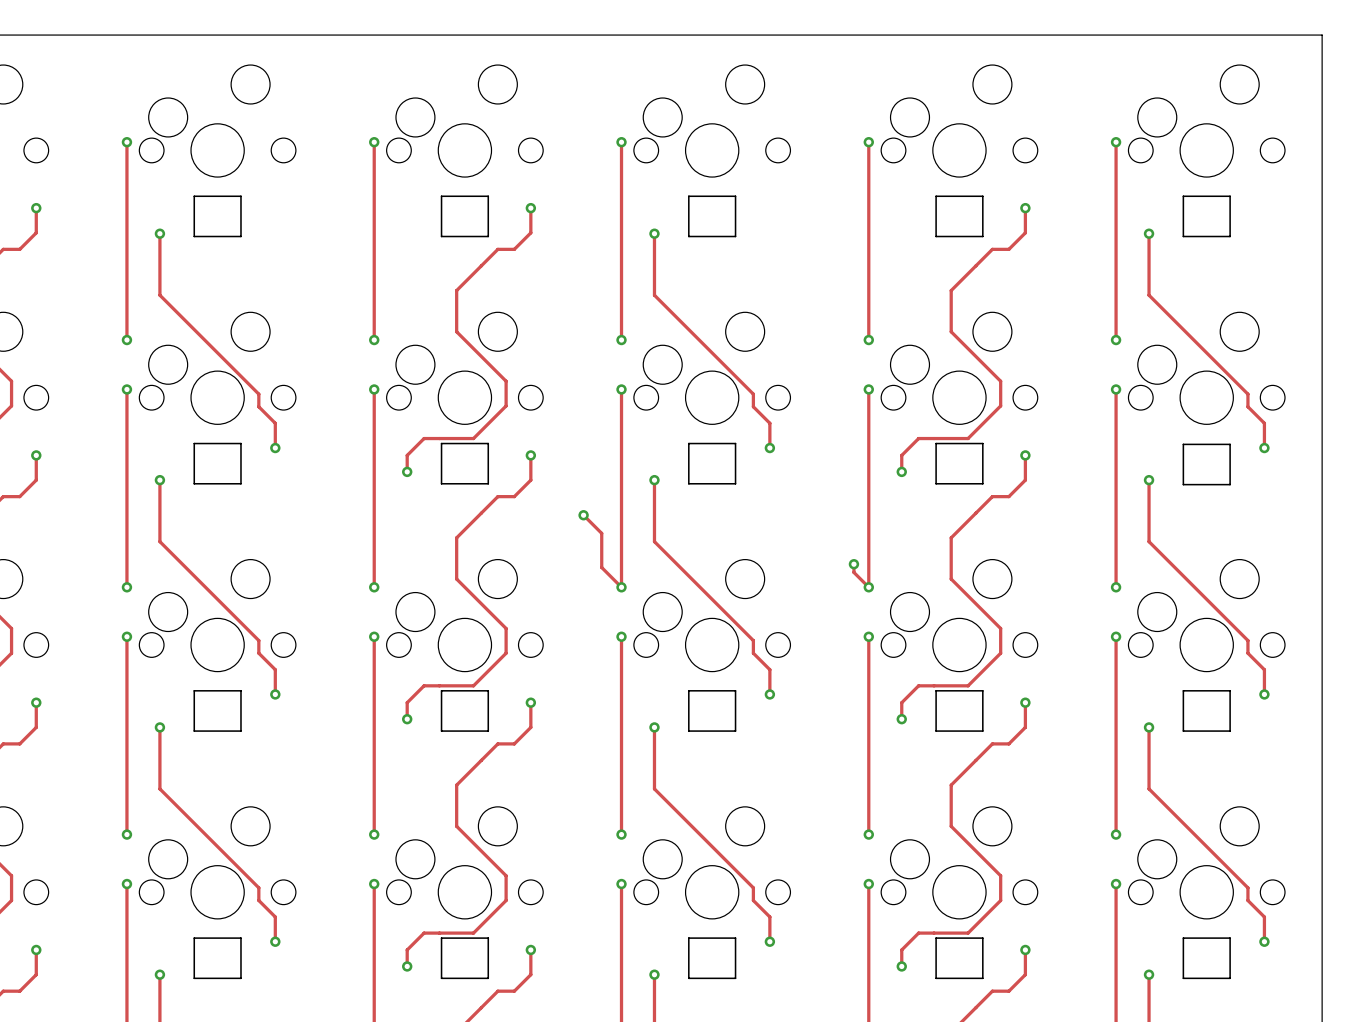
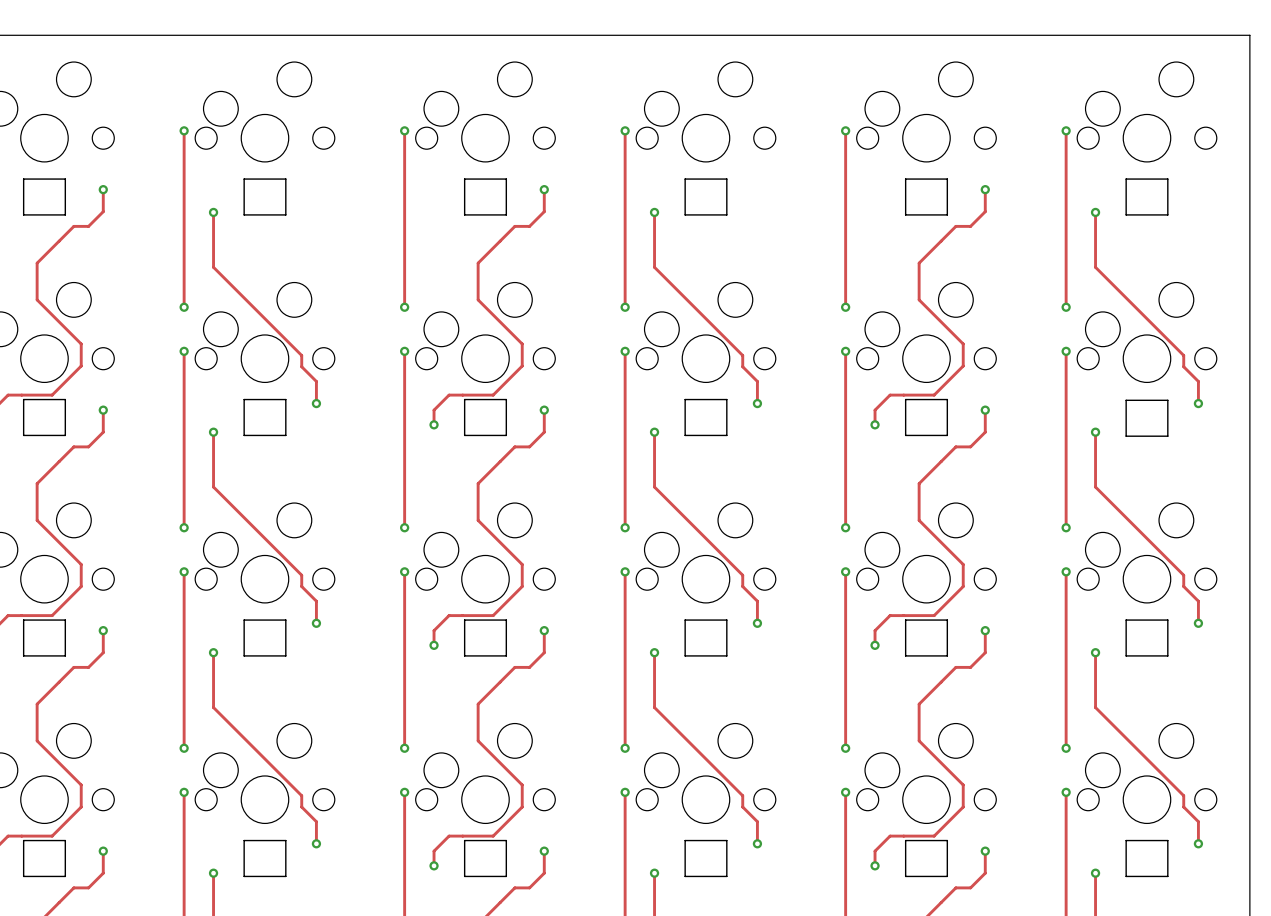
track: (583, 515) (601, 533) (601, 567) (621, 587) -> none
via: (583, 515) -> none
track: (853, 564) (853, 572) (868, 587) -> none
via: (853, 564) -> none

